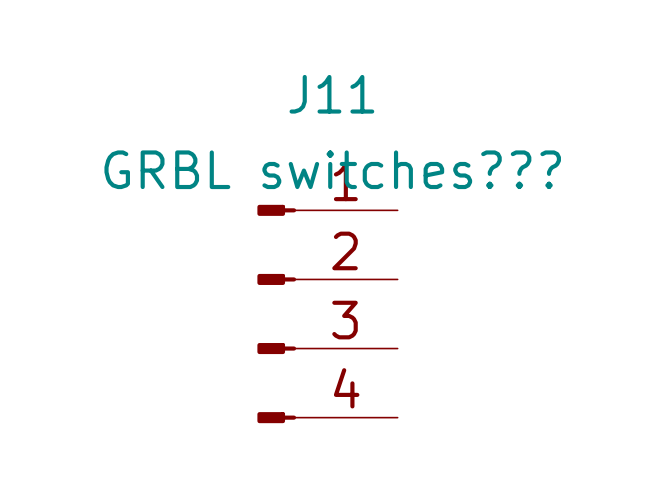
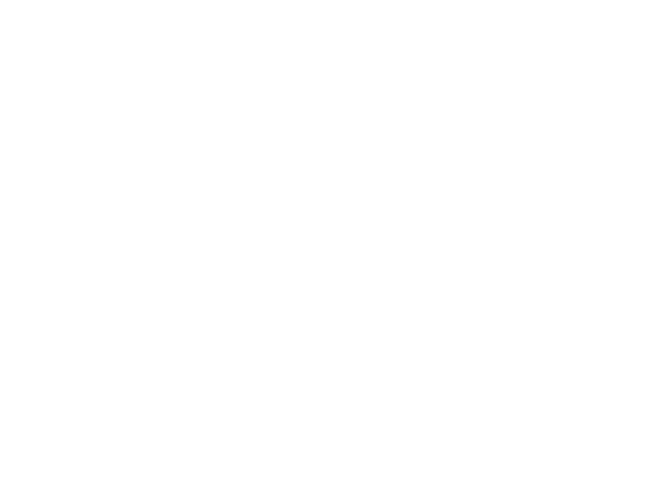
J11: GRBL switches??? (327, 313) -> none

